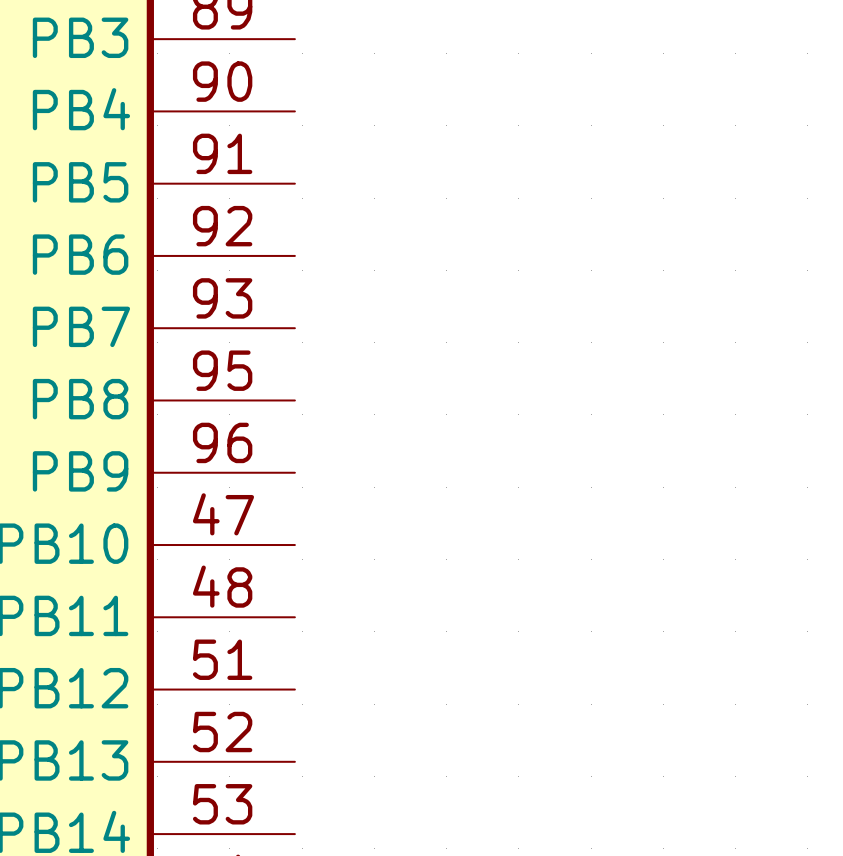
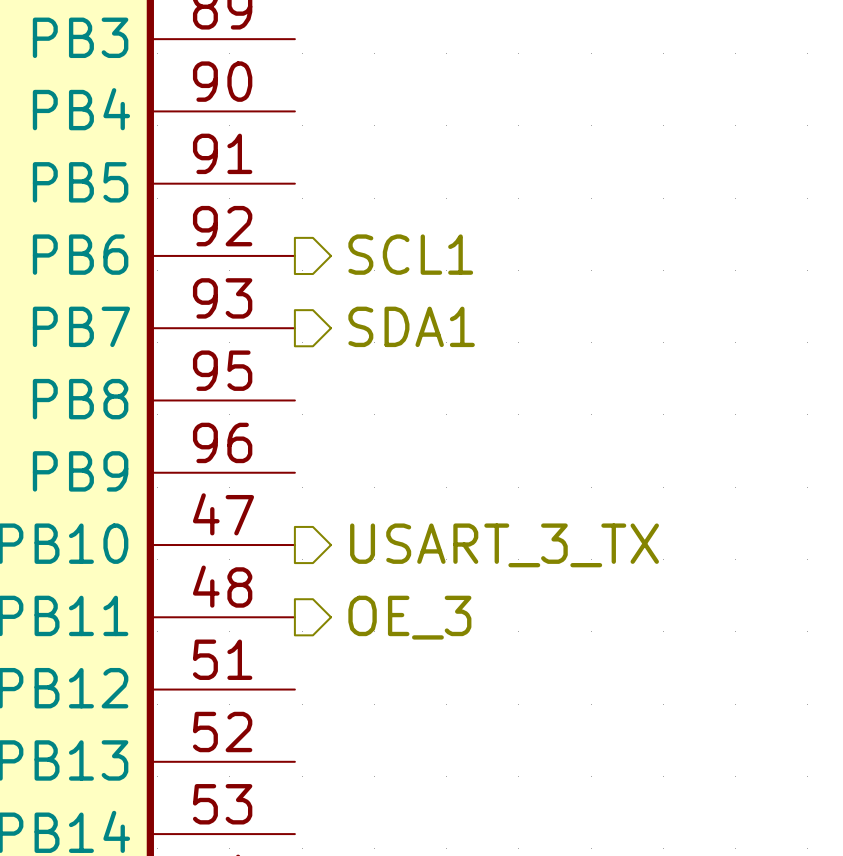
hierarchical label: none -> SCL1 (410, 254)
hierarchical label: none -> SDA1 (411, 326)
hierarchical label: none -> USART_3_TX (504, 545)
hierarchical label: none -> OE_3 (409, 617)

